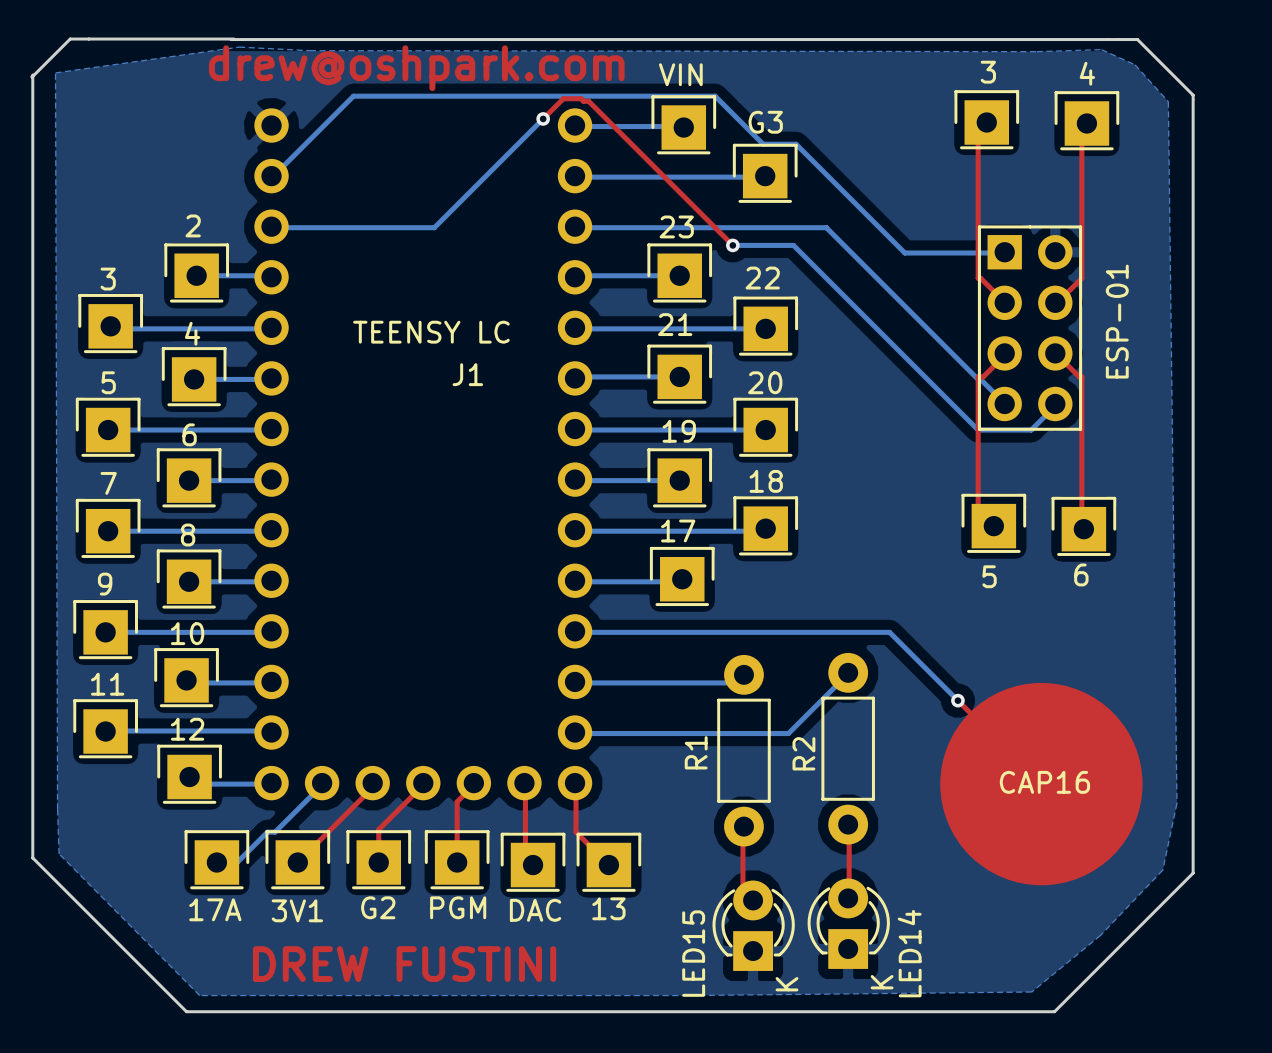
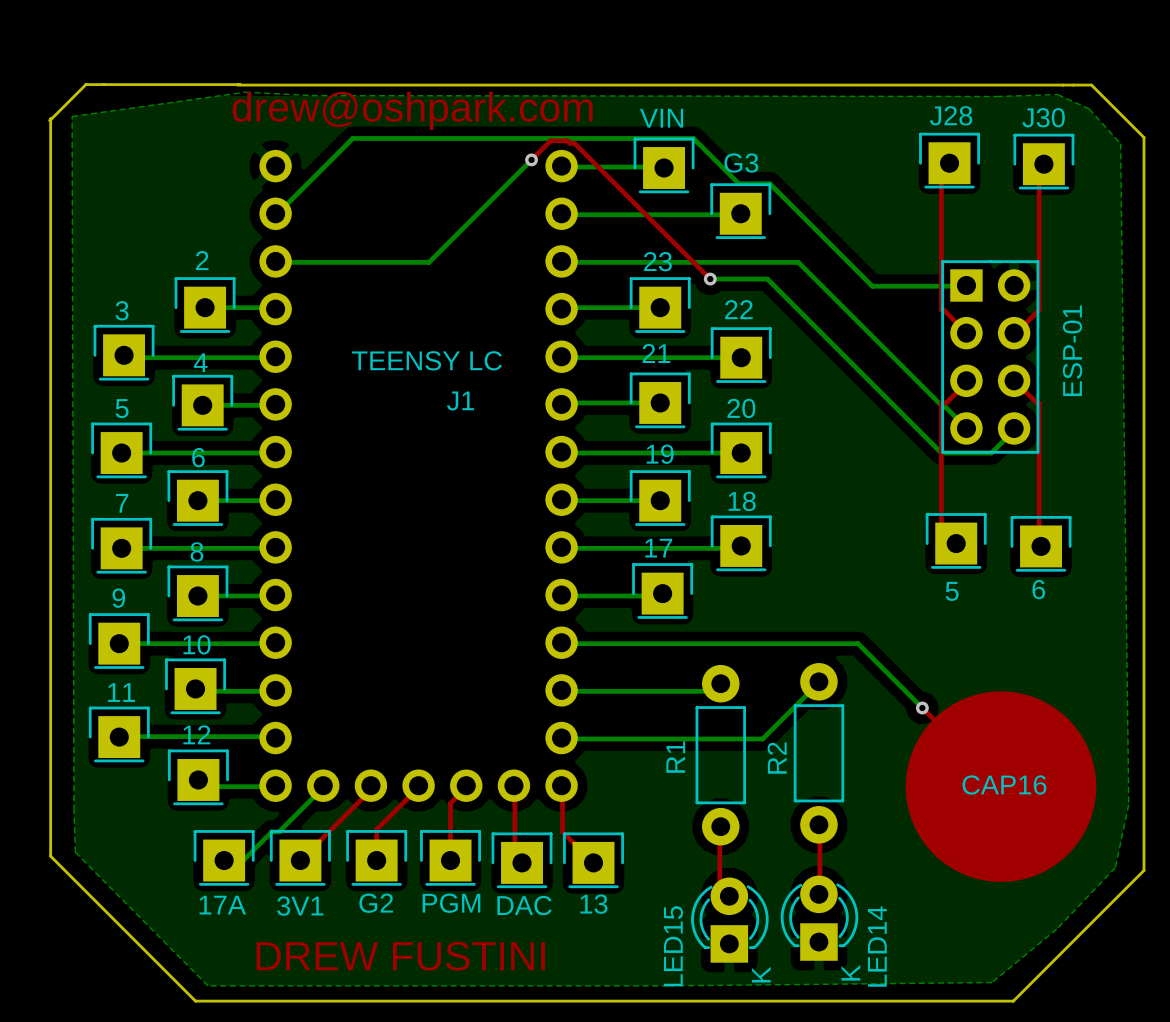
3 name: 3 (988, 72) -> J28 (951, 115)
4 name: 4 (1087, 73) -> J30 (1043, 117)

